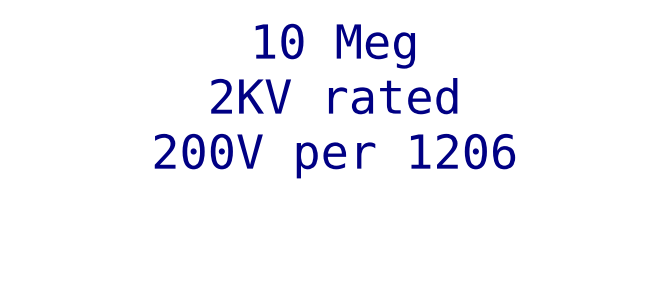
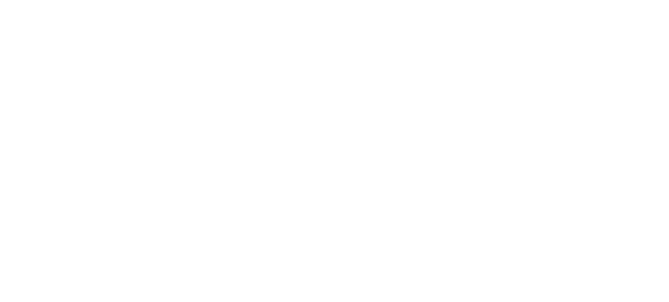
text: 10 Meg (335, 46) -> none
text: 2KV rated (334, 96) -> none
text: 200V per 1206 (334, 156) -> none

